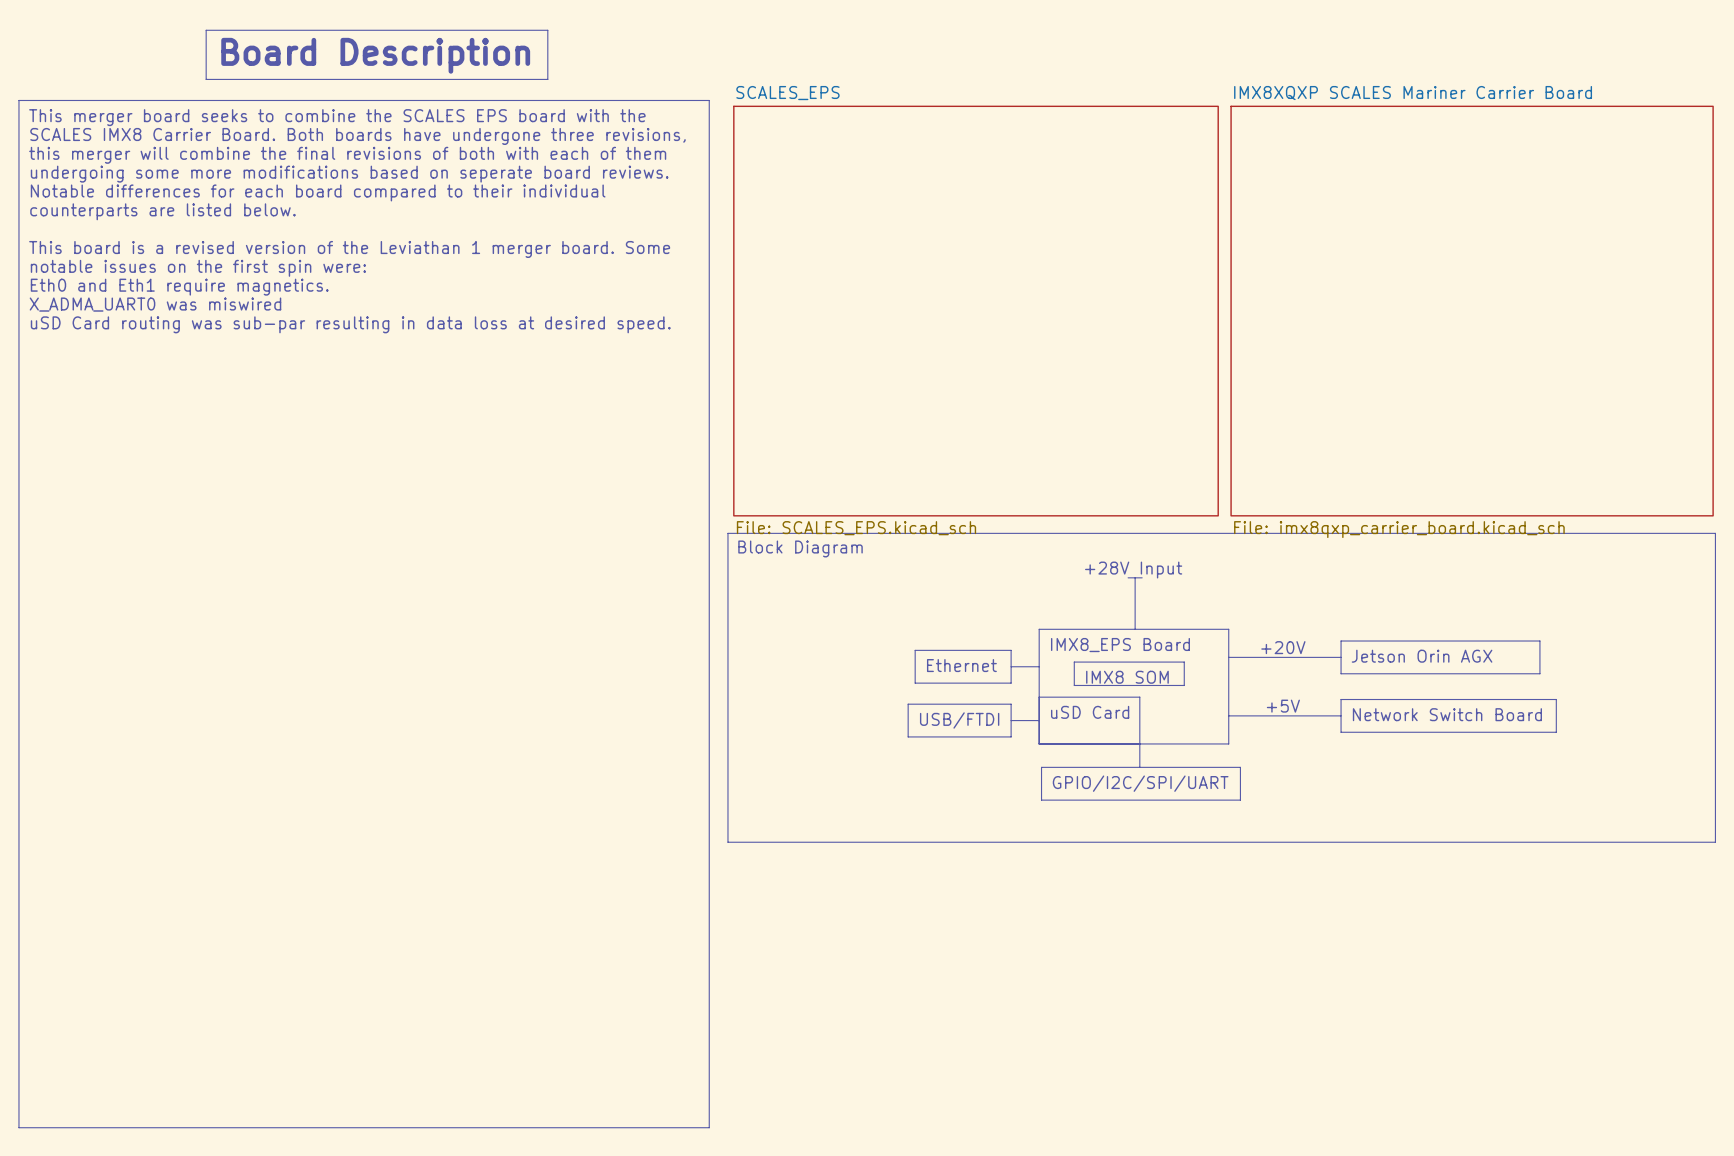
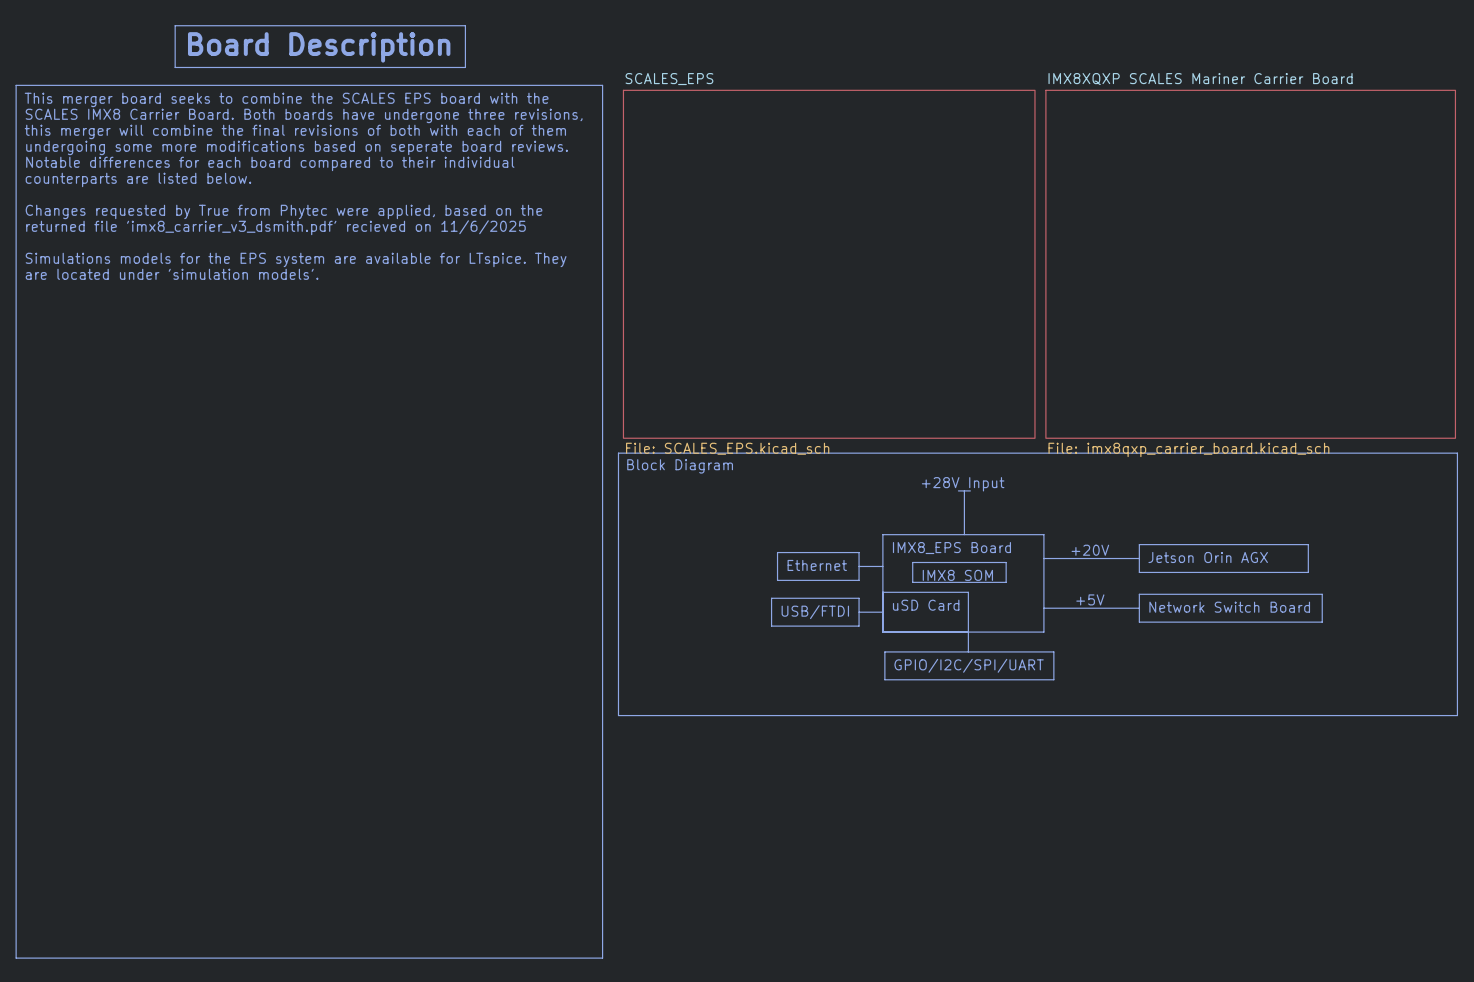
text: This board is a revised version of the Leviathan 1 merger board. Some (349, 249) -> Changes requested by True from Phytec were applied, based on the (284, 211)
text: notable issues on the first spin were: (198, 268) -> returned file 'imx8_carrier_v3_dsmith.pdf' recieved on 11/6/2025 (275, 227)
text: Eth0 and Eth1 require magnetics. (179, 287) -> none
text: X_ADMA_UART0 was miswired (155, 304) -> Simulations models for the EPS system are available for LTspice. They (296, 259)
text: uSD Card routing was sub-par resulting in data loss at desired speed. (350, 324) -> are located under 'simulation models'. (172, 274)

